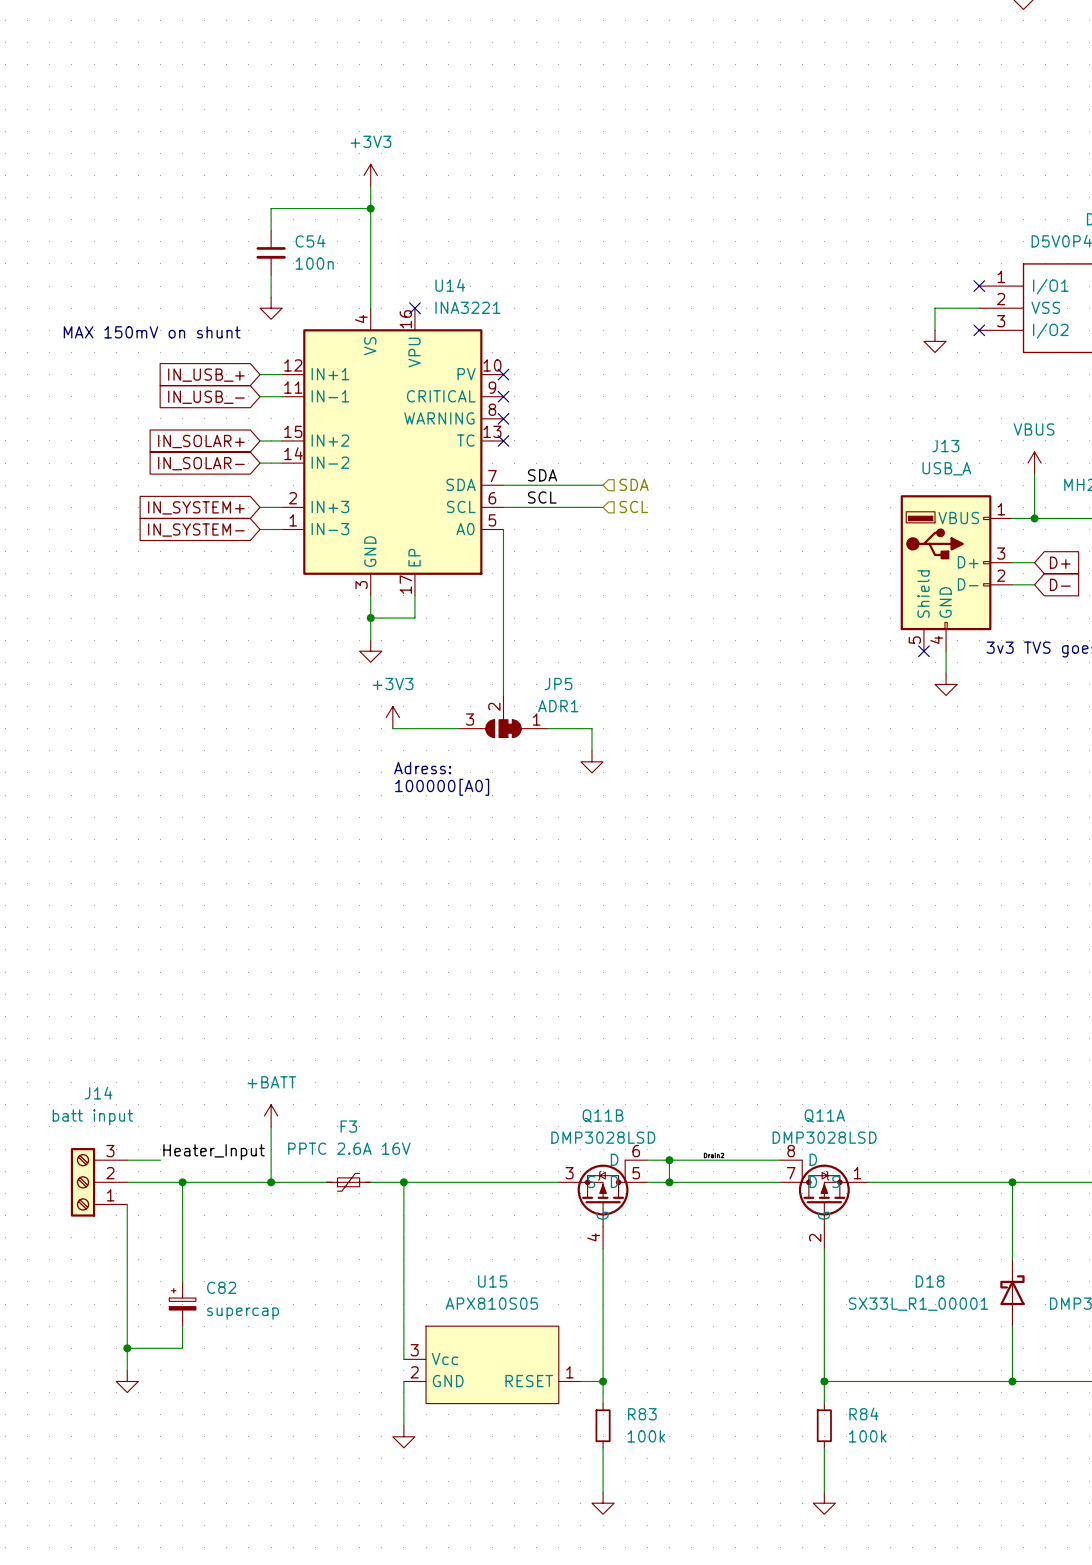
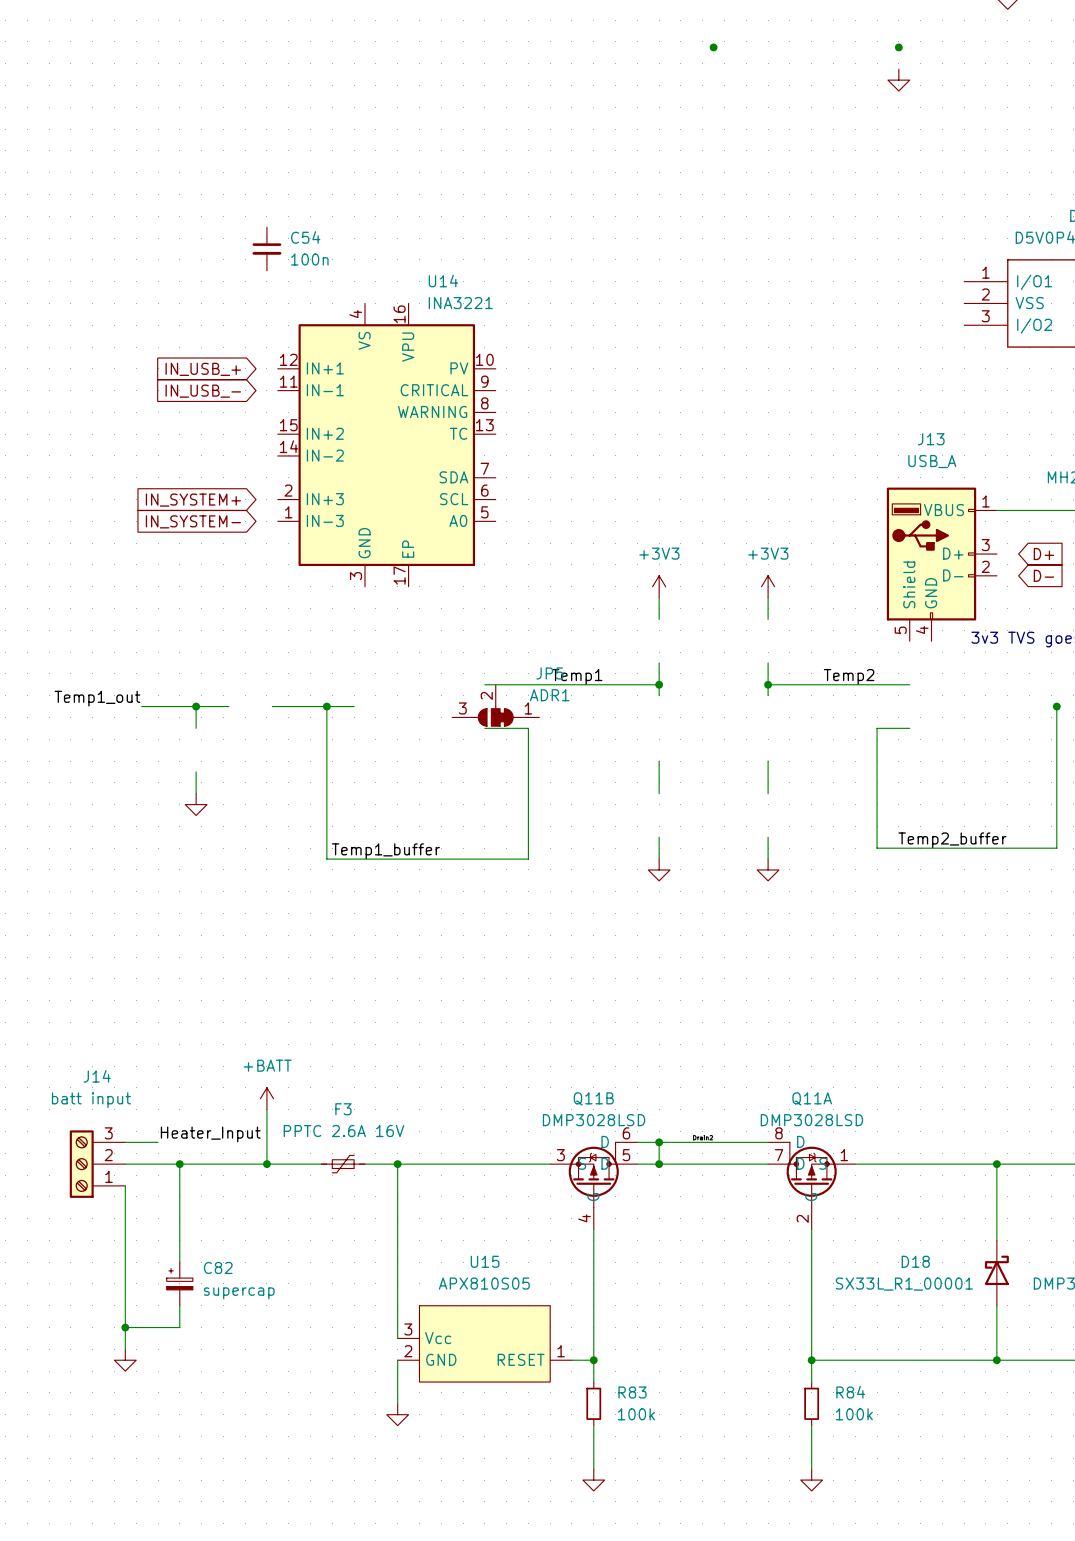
junction: none -> (713, 47)
junction: none -> (898, 47)
power symbol: none -> (898, 80)
power symbol: +3V3 (370, 175) -> none
wire: (370, 186) (370, 308) -> none
wire: (370, 208) (271, 208) (271, 230) -> none
junction: (370, 208) -> none
wire: (271, 275) (271, 297) -> none
no-connect mark: (979, 286) -> none
power symbol: (271, 308) -> none
no-connect mark: (414, 308) -> none
wire: (979, 308) (935, 308) (935, 330) -> none
no-connect mark: (979, 330) -> none
text: MAX 150mV on shunt (152, 332) -> none
power symbol: (935, 341) -> none
wire: (260, 374) (282, 374) -> none
no-connect mark: (503, 374) -> none
wire: (260, 396) (282, 396) -> none
no-connect mark: (503, 396) -> none
no-connect mark: (503, 418) -> none
wire: (260, 440) (282, 440) -> none
no-connect mark: (503, 440) -> none
global label: IN_SOLAR+ (201, 441) -> none
global label: IN_SOLAR- (201, 463) -> none
wire: (260, 463) (282, 463) -> none
power symbol: VBUS (1034, 463) -> none
wire: (1034, 474) (1034, 518) -> none
label: SDA (542, 475) -> none
hierarchical label: SDA (634, 484) -> none
wire: (503, 485) (603, 485) -> none
label: SCL (542, 497) -> none
hierarchical label: SCL (633, 506) -> none
wire: (260, 507) (282, 507) -> none
wire: (503, 507) (603, 507) -> none
junction: (1034, 518) -> none
wire: (260, 529) (282, 529) -> none
wire: (503, 529) (503, 695) -> none
wire: (1012, 562) (1034, 562) -> none
wire: (1012, 584) (1034, 584) -> none
wire: (370, 595) (370, 640) -> none
wire: (414, 595) (414, 618) (370, 618) -> none
power symbol: none -> +3V3 (659, 586)
power symbol: none -> +3V3 (768, 586)
wire: none -> (659, 597) (659, 619)
junction: (370, 618) -> none
power symbol: (370, 651) -> none
no-connect mark: (923, 651) -> none
wire: (946, 651) (946, 673) -> (768, 597) (768, 619)
wire: none -> (659, 662) (659, 695)
wire: none -> (768, 662) (768, 695)
power symbol: (946, 684) -> none
label: none -> Temp1 (577, 676)
label: none -> Temp2 (849, 676)
wire: none -> (484, 684) (659, 684)
junction: none -> (659, 684)
wire: none -> (768, 684) (909, 684)
junction: none -> (768, 684)
label: none -> Temp1_out (97, 698)
wire: none -> (141, 706) (228, 706)
wire: none -> (196, 706) (196, 728)
junction: none -> (196, 706)
wire: none -> (272, 706) (354, 706)
wire: none -> (326, 706) (326, 859) (528, 859) (528, 728) (484, 728)
junction: none -> (326, 706)
power symbol: +3V3 (392, 717) -> none
wire: none -> (1056, 706) (1056, 848) (877, 848) (877, 728) (909, 728)
junction: none -> (1056, 706)
wire: (392, 728) (459, 728) -> none
wire: (547, 728) (591, 728) (591, 750) -> none
power symbol: (591, 761) -> none
text: Adress: (422, 768) -> none
wire: none -> (659, 761) (659, 793)
wire: none -> (768, 761) (768, 793)
wire: none -> (196, 771) (196, 793)
text: 100000[A0] (442, 787) -> none
power symbol: none -> (196, 804)
wire: none -> (659, 837) (659, 859)
wire: none -> (768, 837) (768, 859)
label: none -> Temp2_buffer (952, 840)
label: none -> Temp1_buffer (385, 851)
power symbol: none -> (659, 869)
power symbol: none -> (768, 869)

